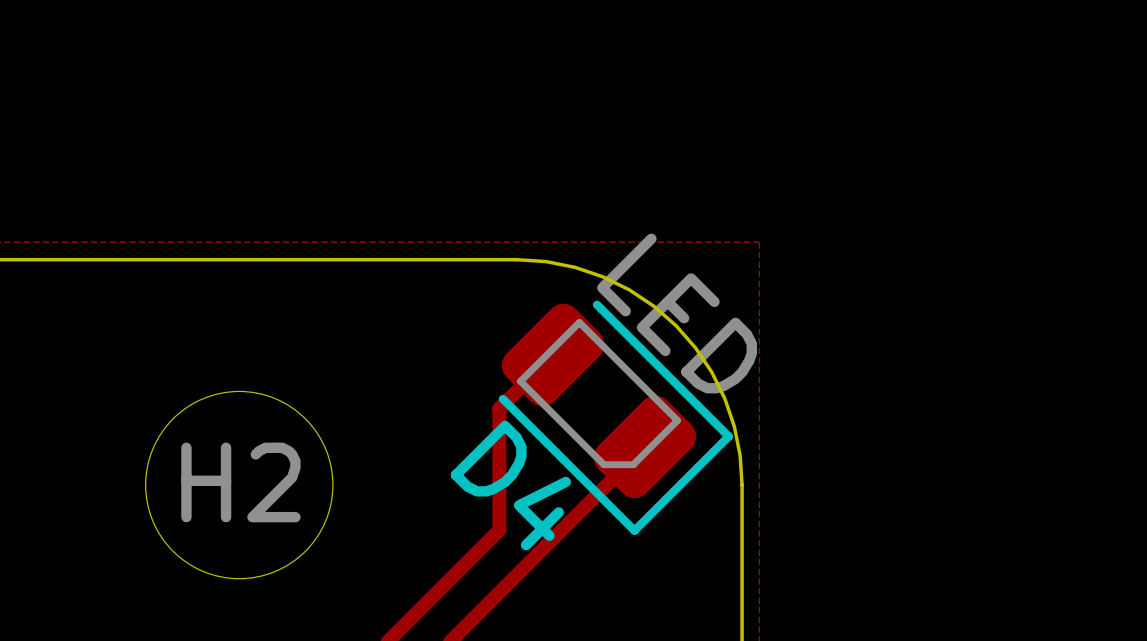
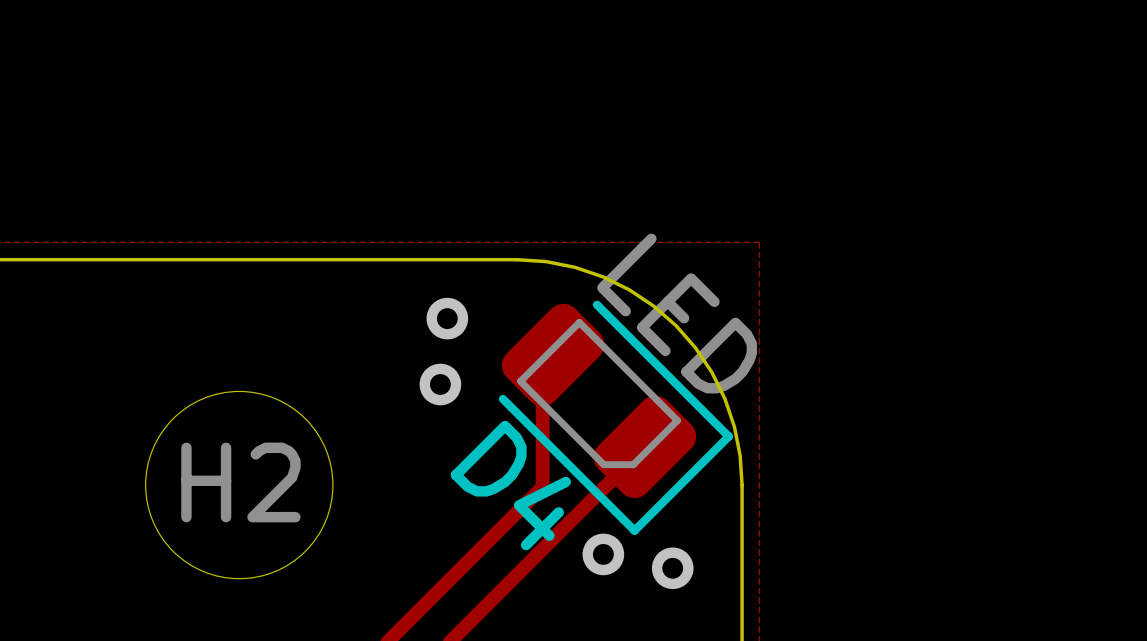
via: none -> (447, 318)
top track: (542, 365) (499, 408) (499, 530) -> (542, 365) (542, 486) (499, 530)
via: none -> (440, 384)
via: none -> (603, 554)
via: none -> (672, 568)

